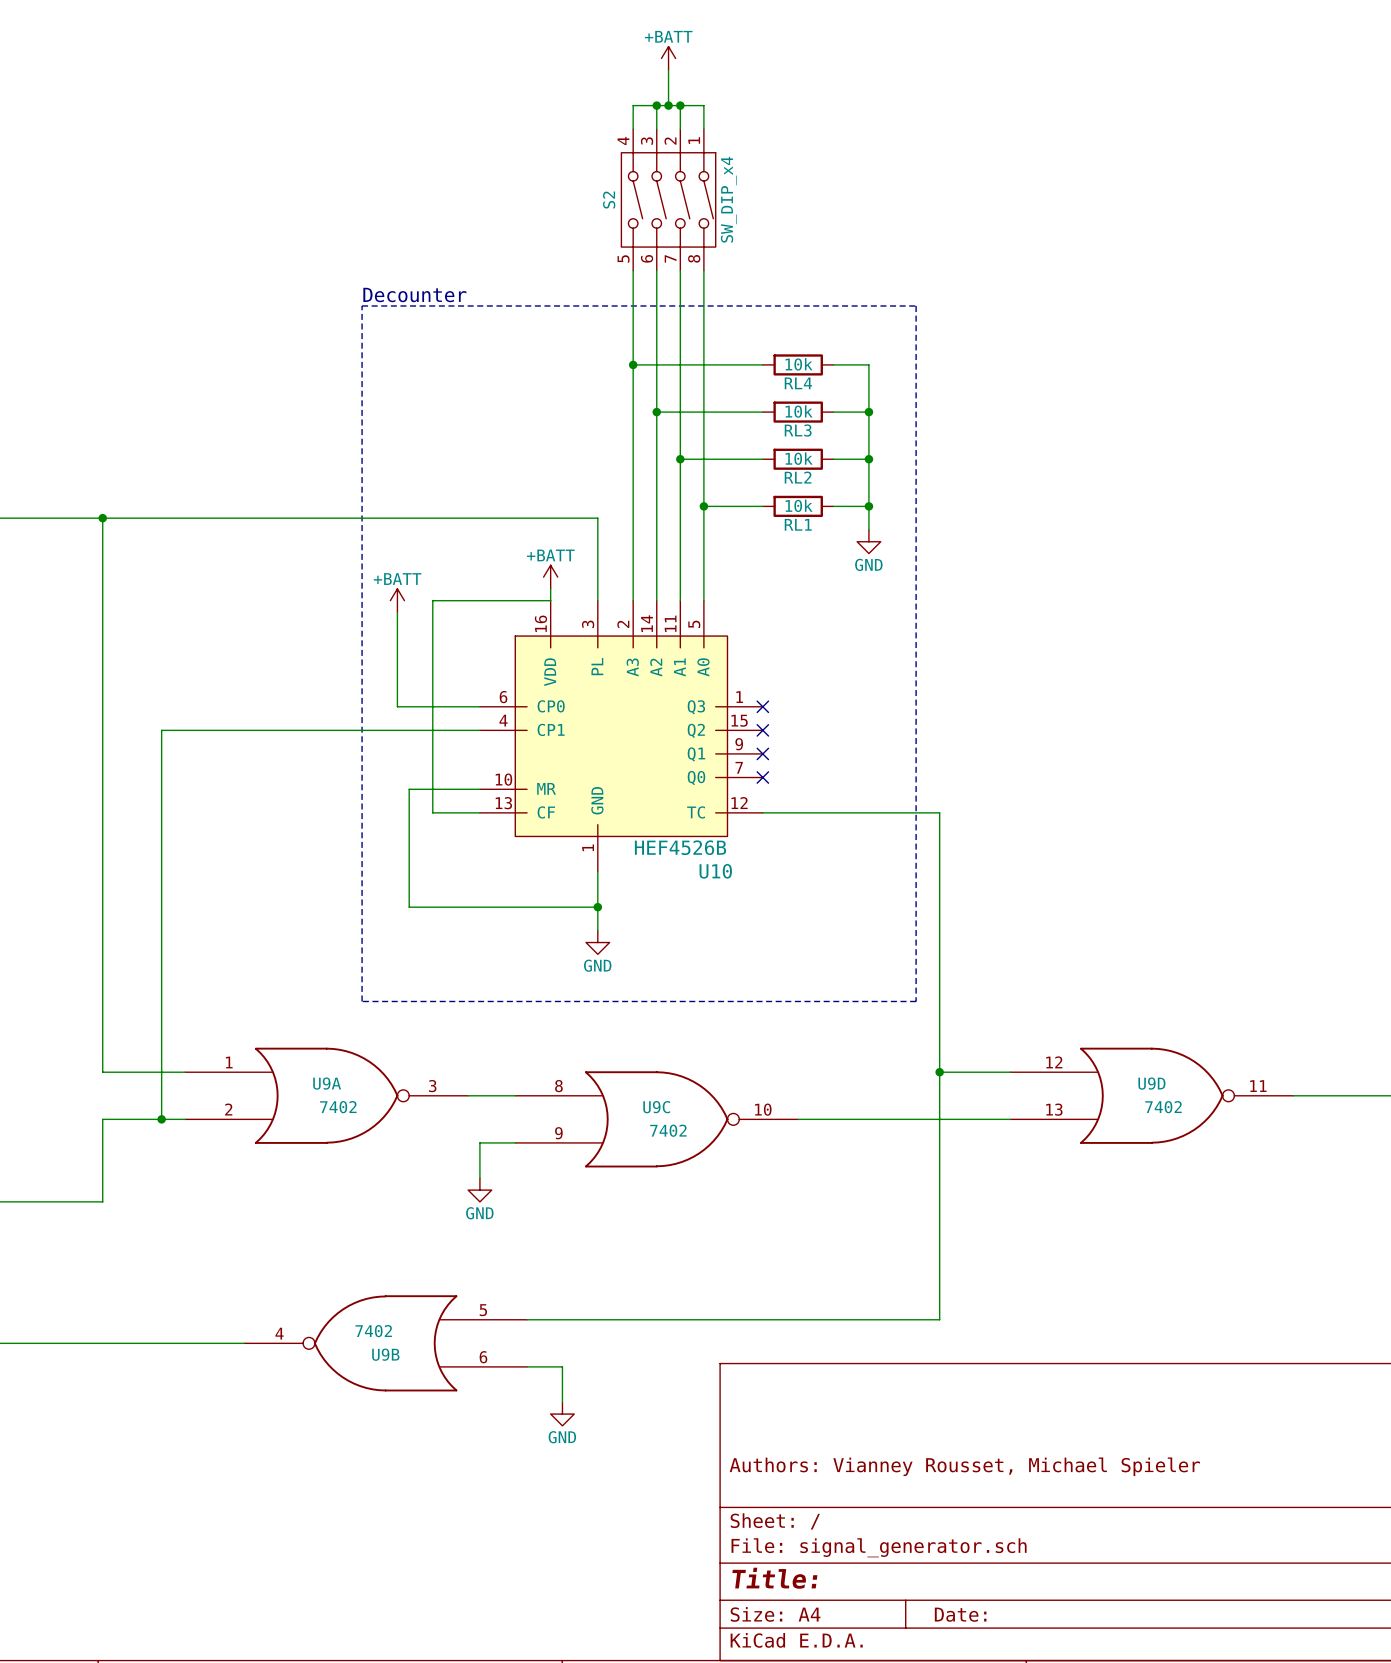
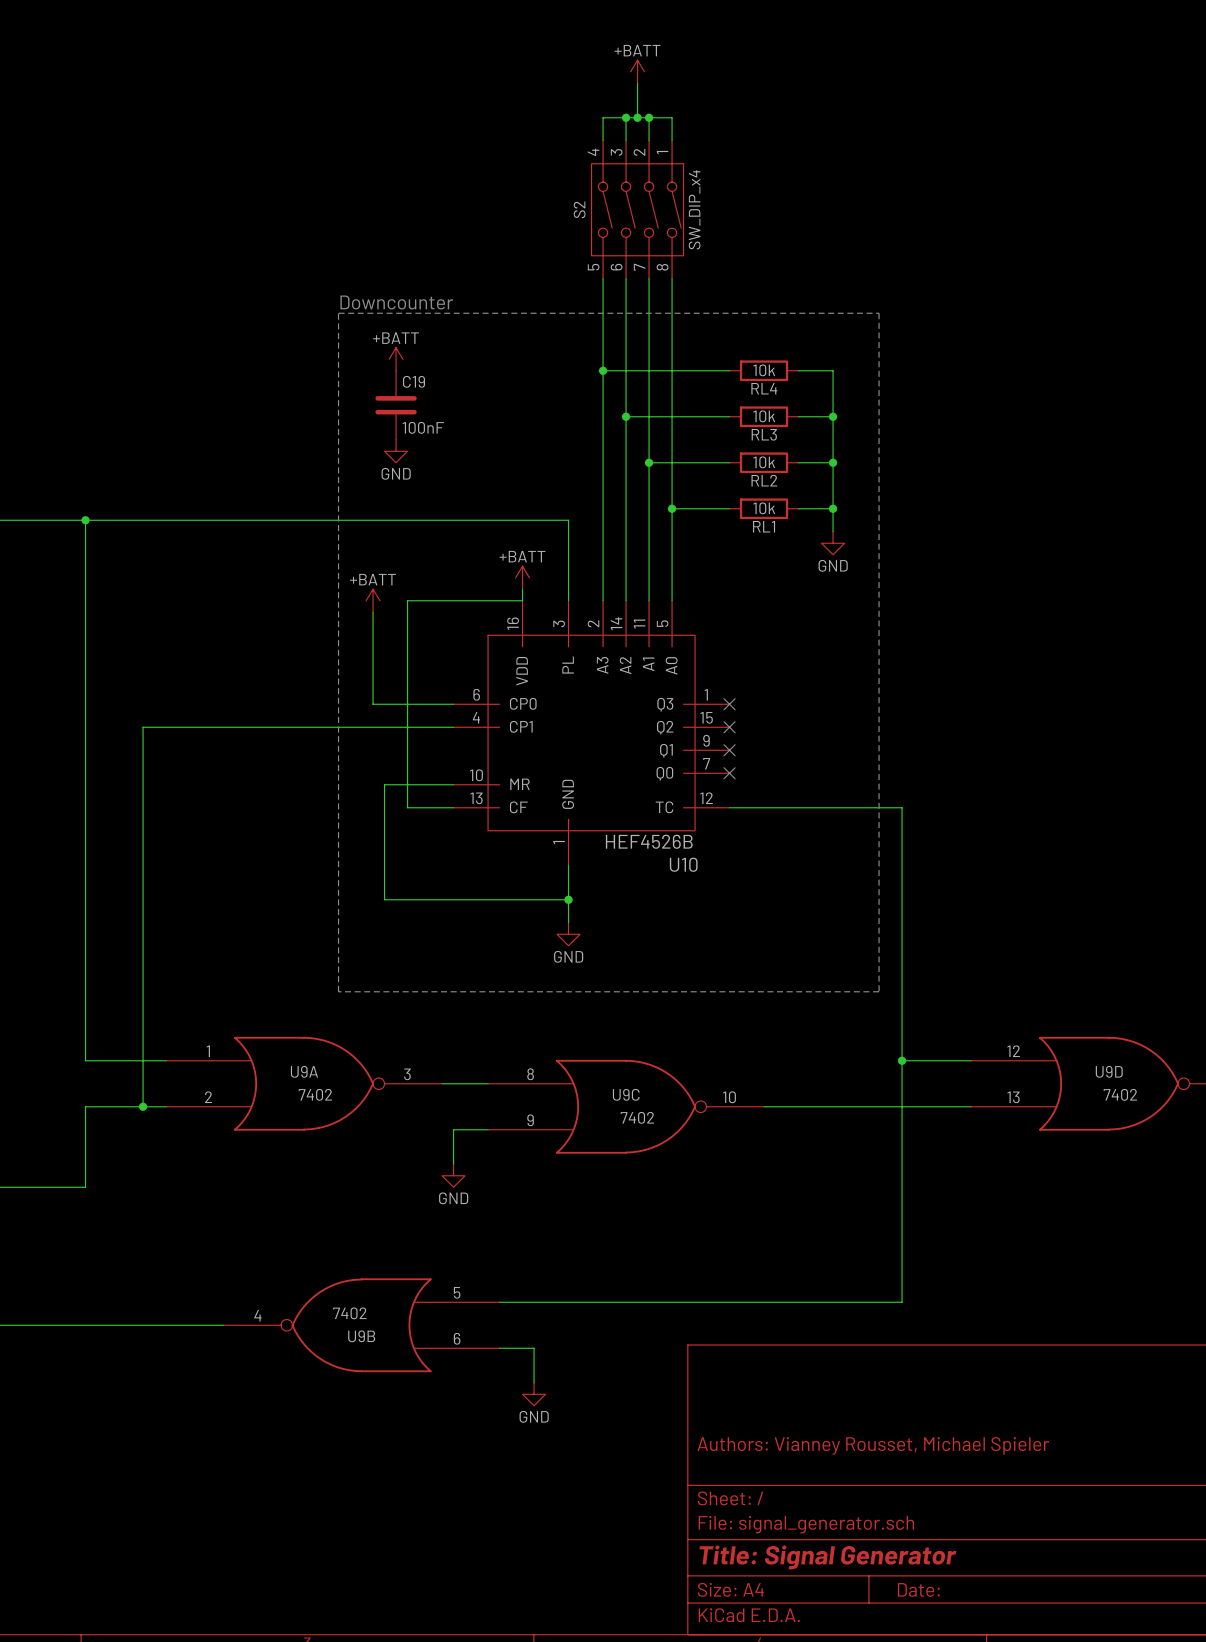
text: Decounter (414, 295) -> Downcounter (396, 302)
power symbol: none -> +BATT (396, 359)
C19: none -> 100nF (396, 405)
power symbol: none -> GND (396, 451)
title block: Title: (774, 1578) -> Title: Signal Generator (827, 1557)

